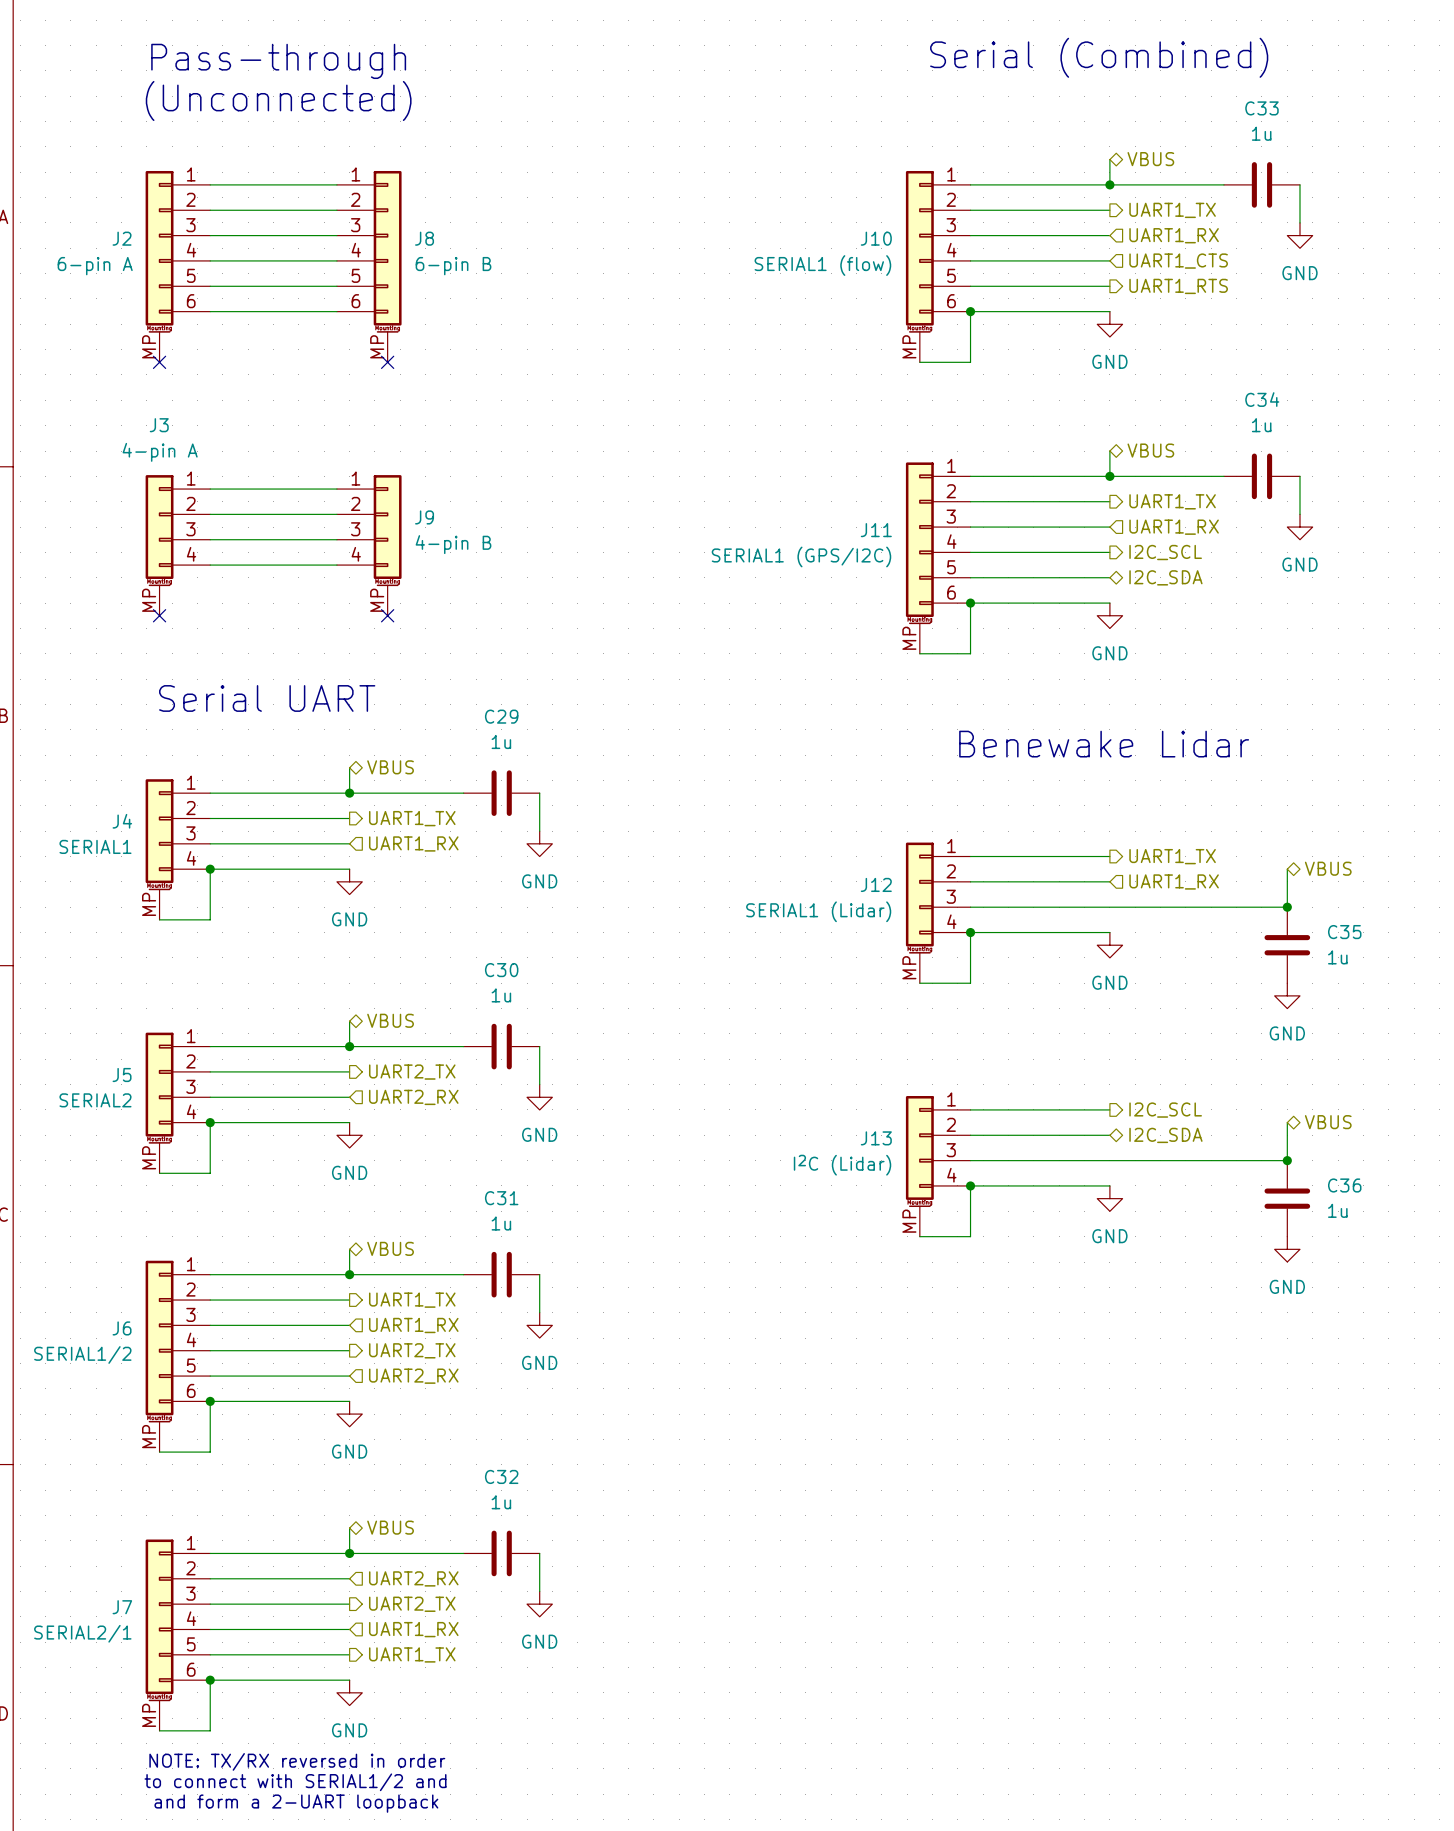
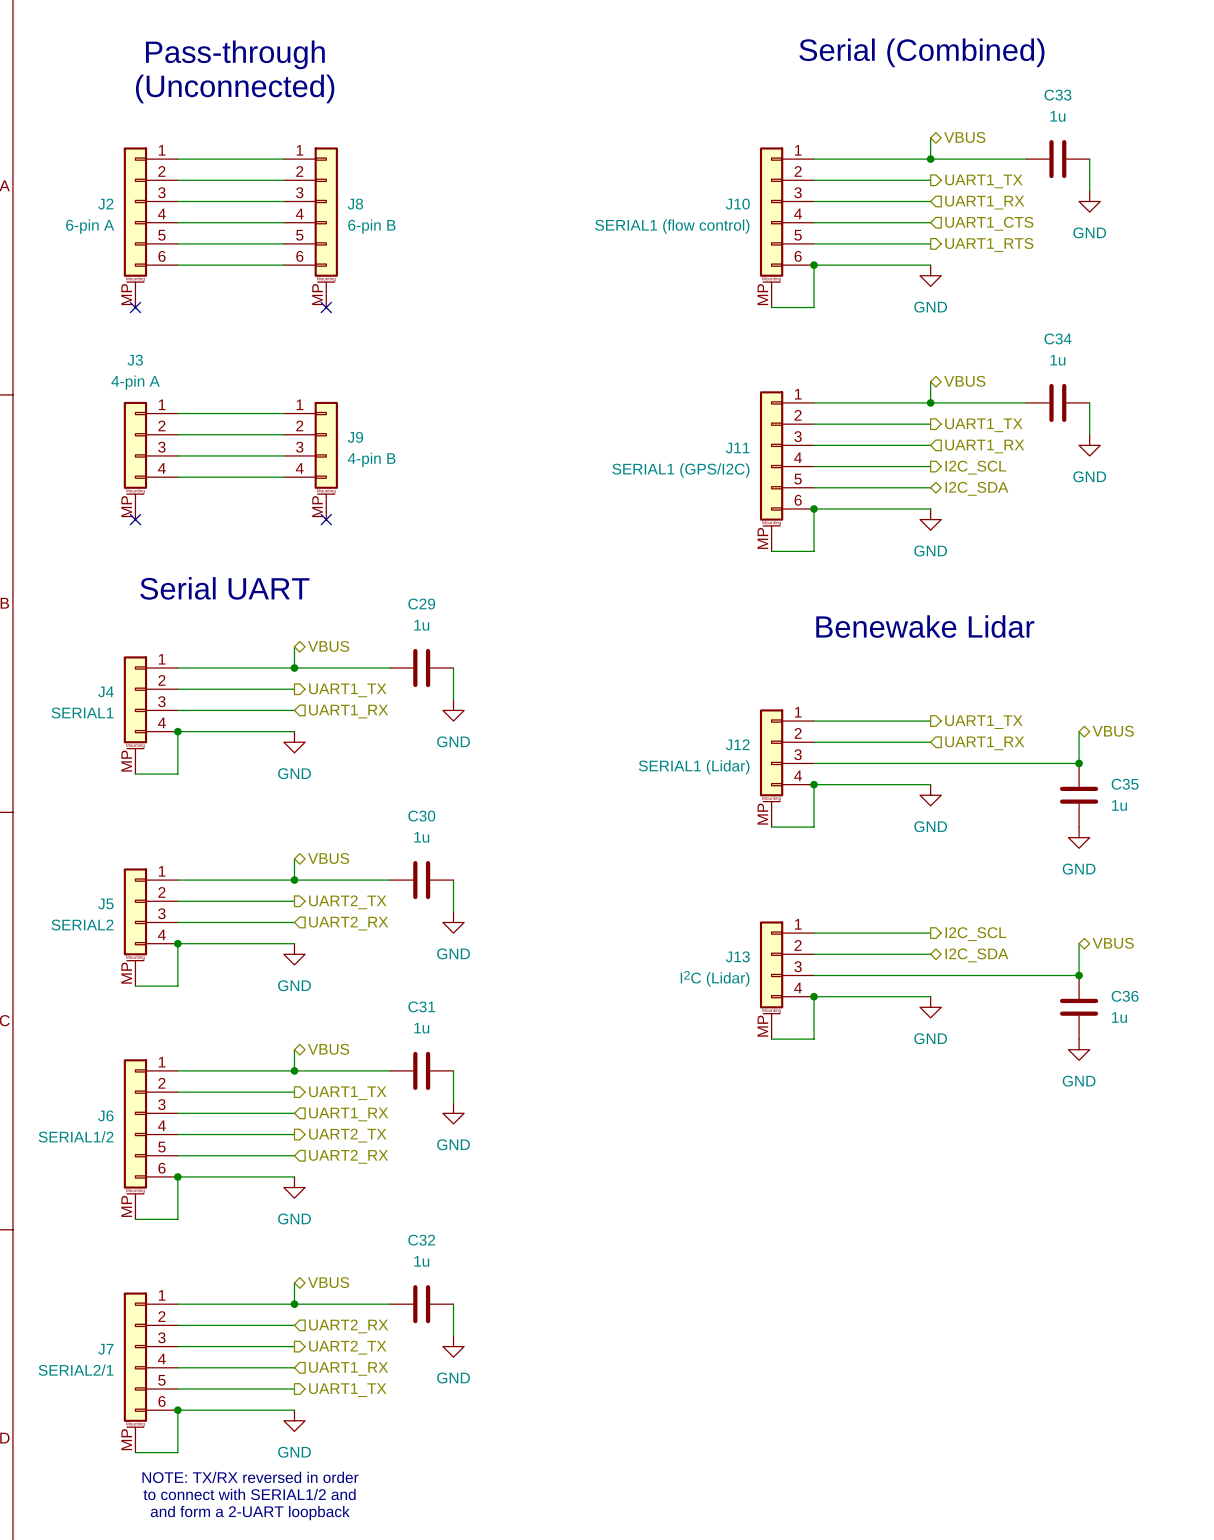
J10 value: SERIAL1 (flow) (822, 265) -> SERIAL1 (flow control) (672, 226)

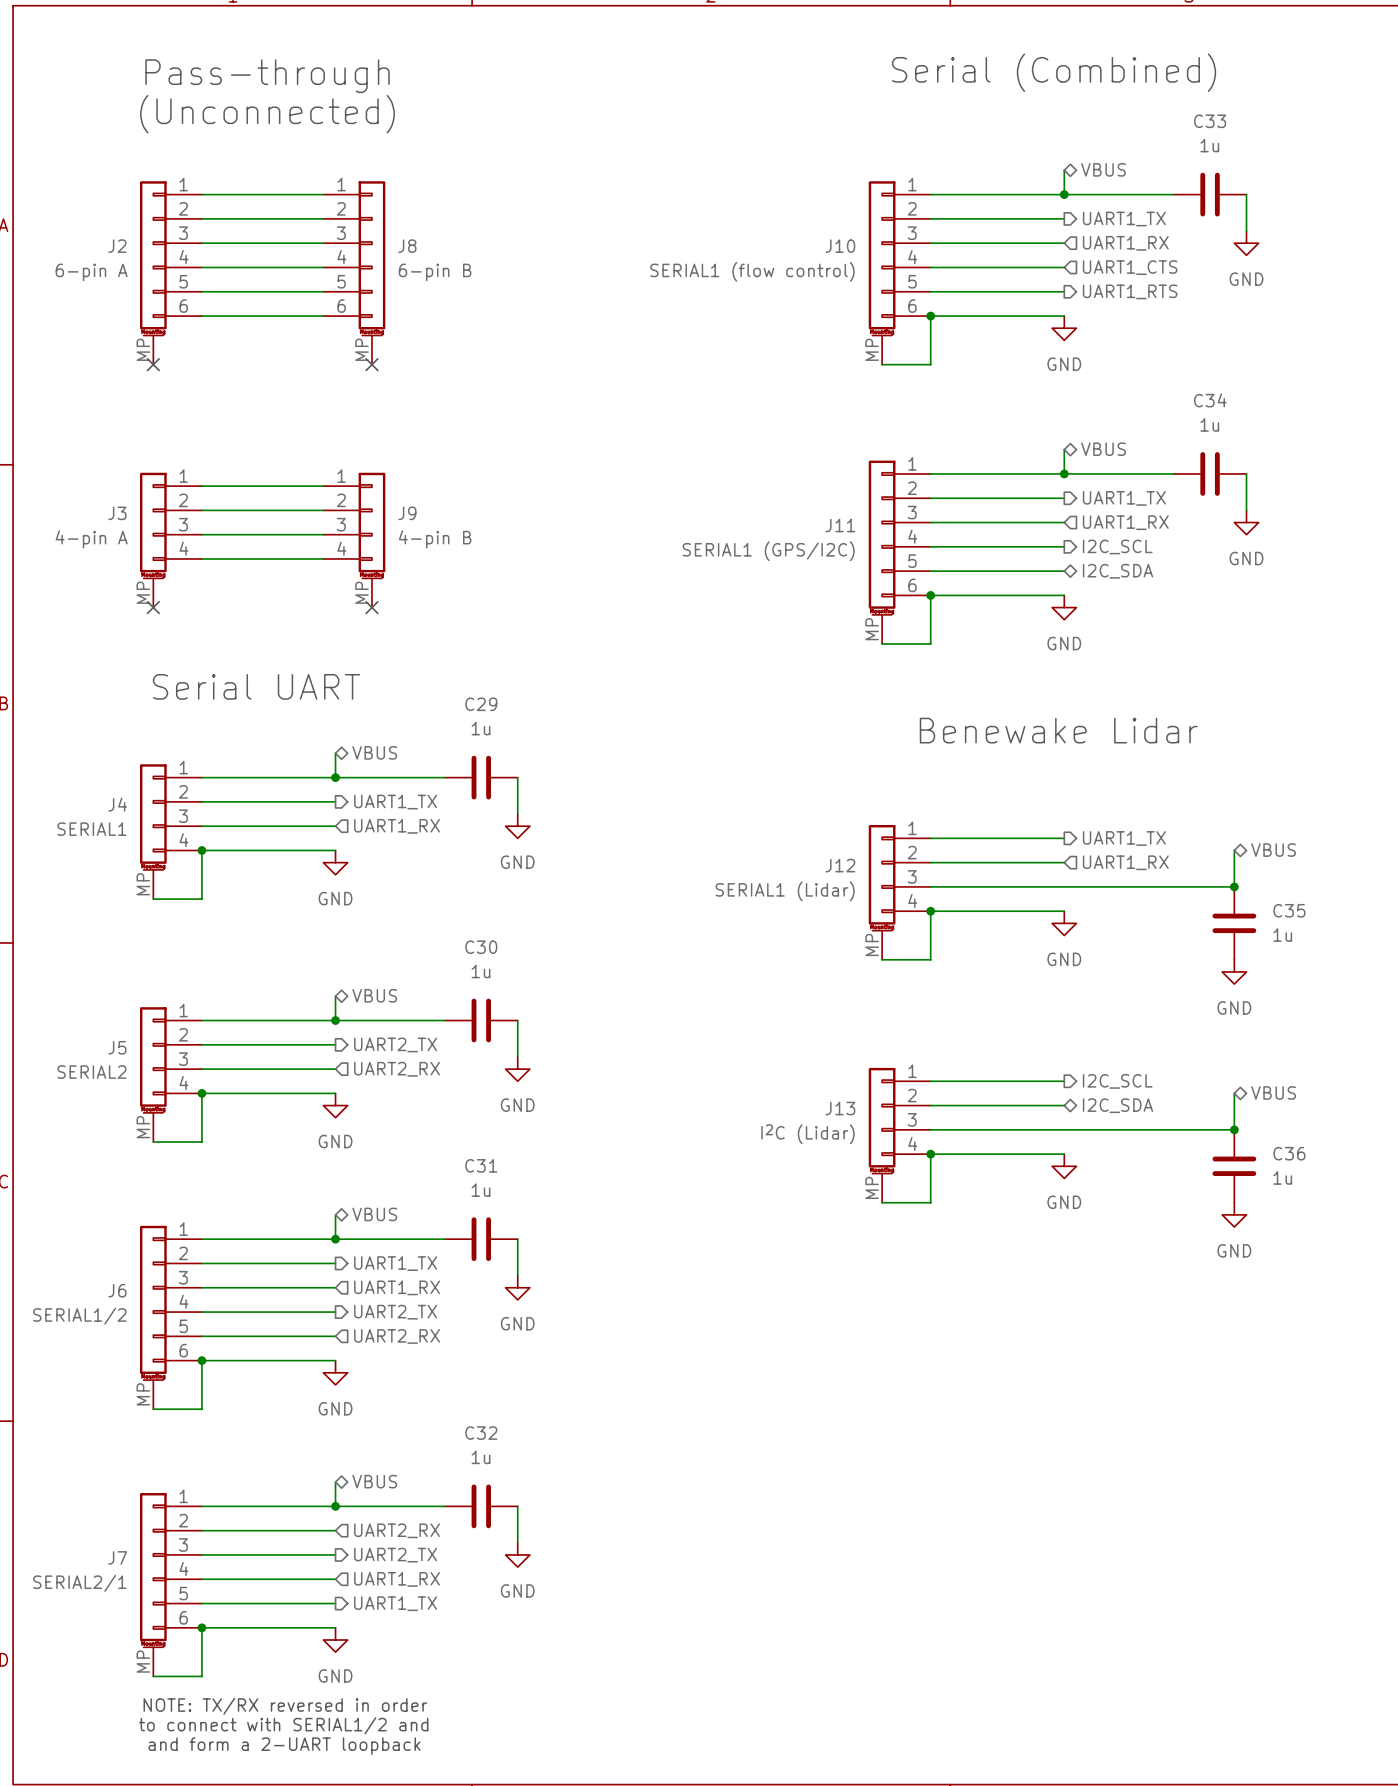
J3 name position: J3 (135, 360) -> J3 (117, 513)
J3 value position: 4-pin A (135, 382) -> 4-pin A (91, 539)

